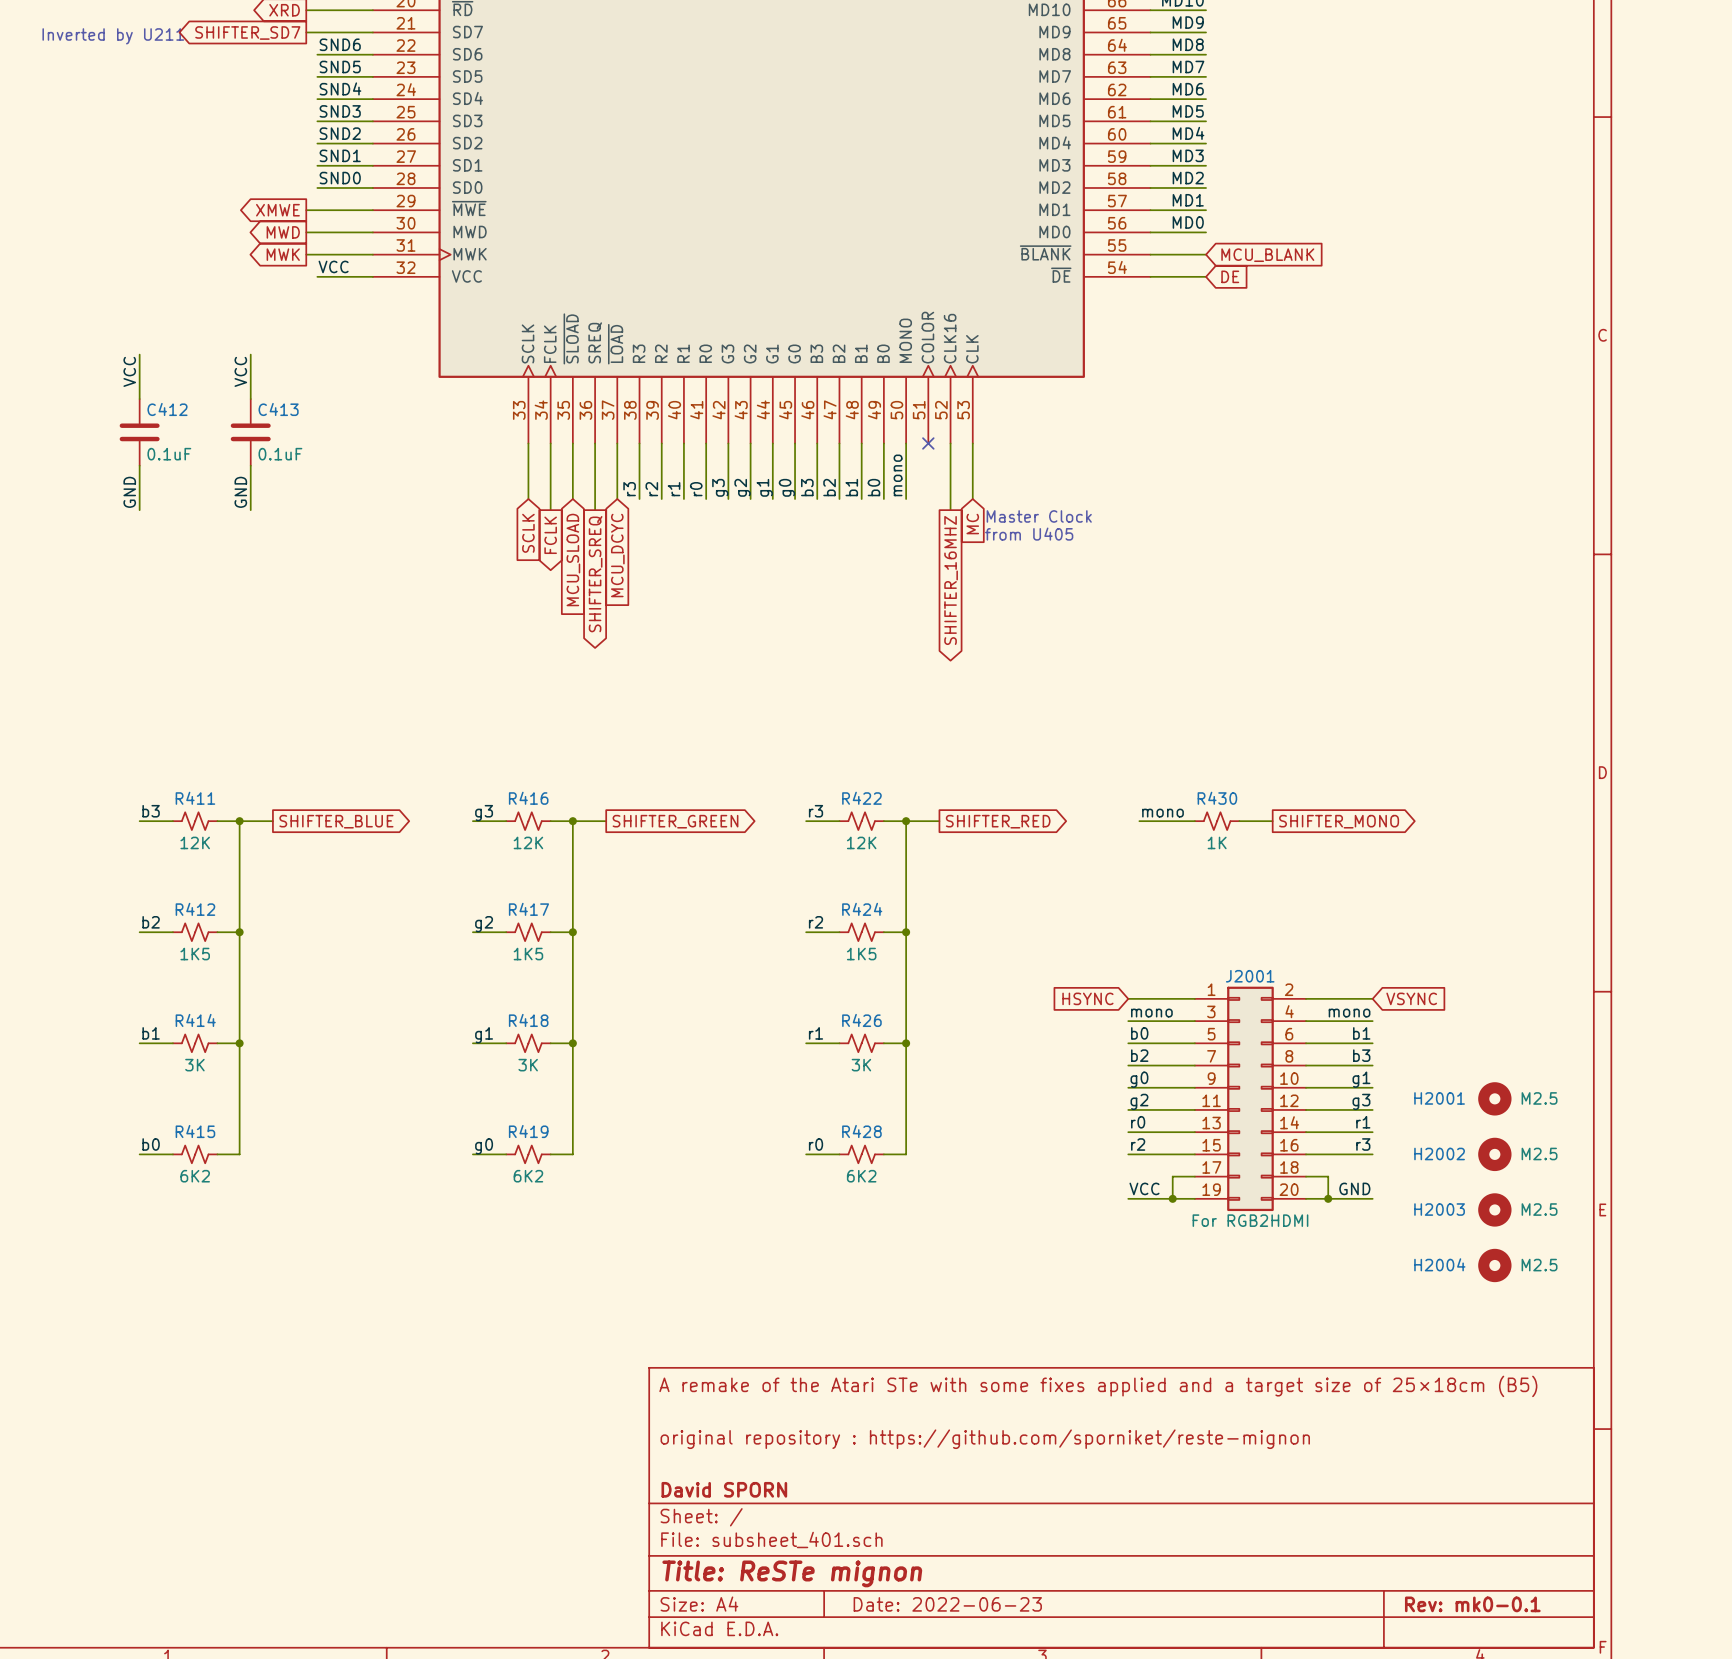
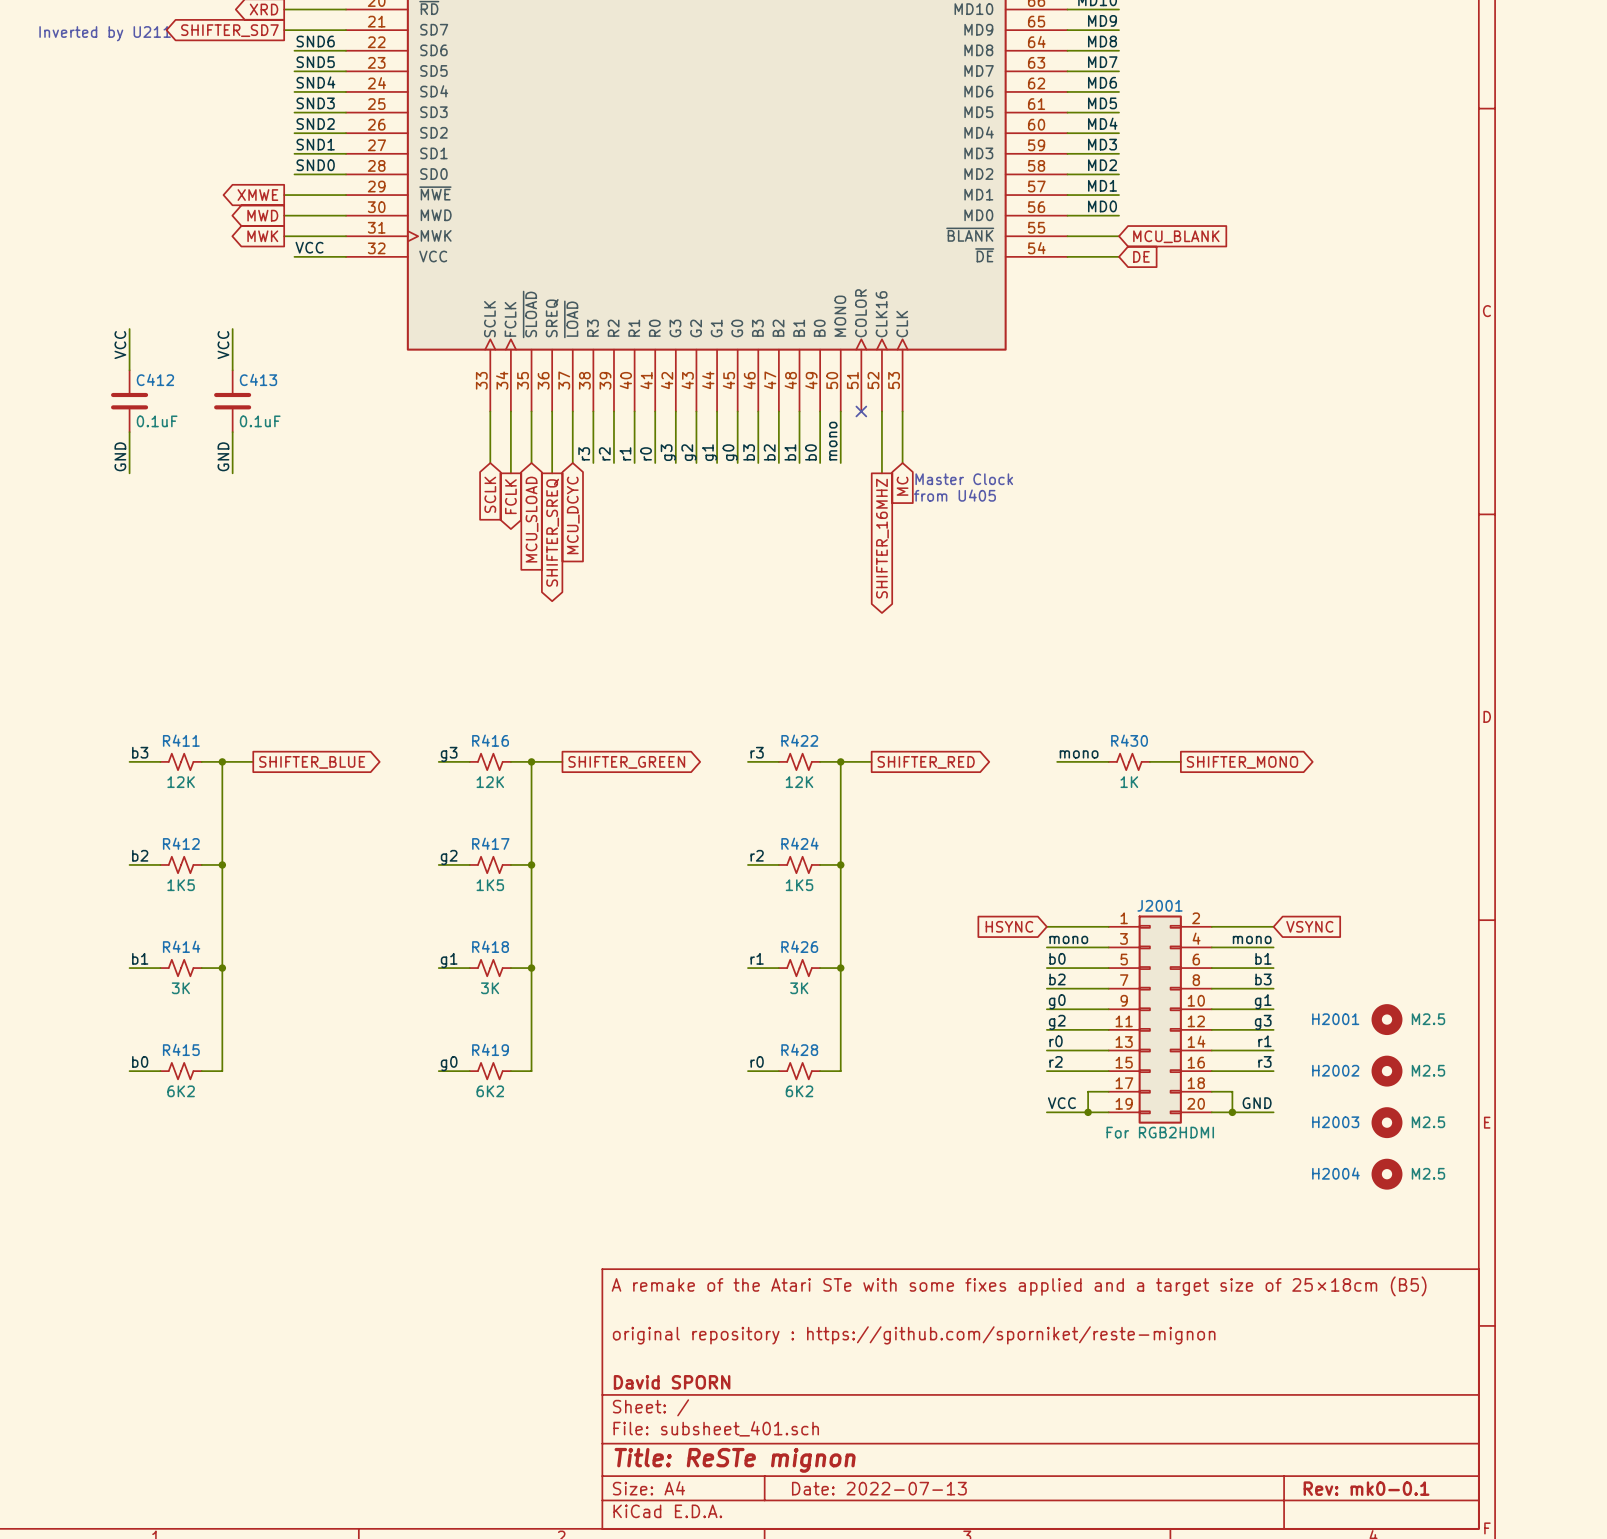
title block: Date: 2022-06-23 (947, 1604) -> Date: 2022-07-13 (879, 1488)

